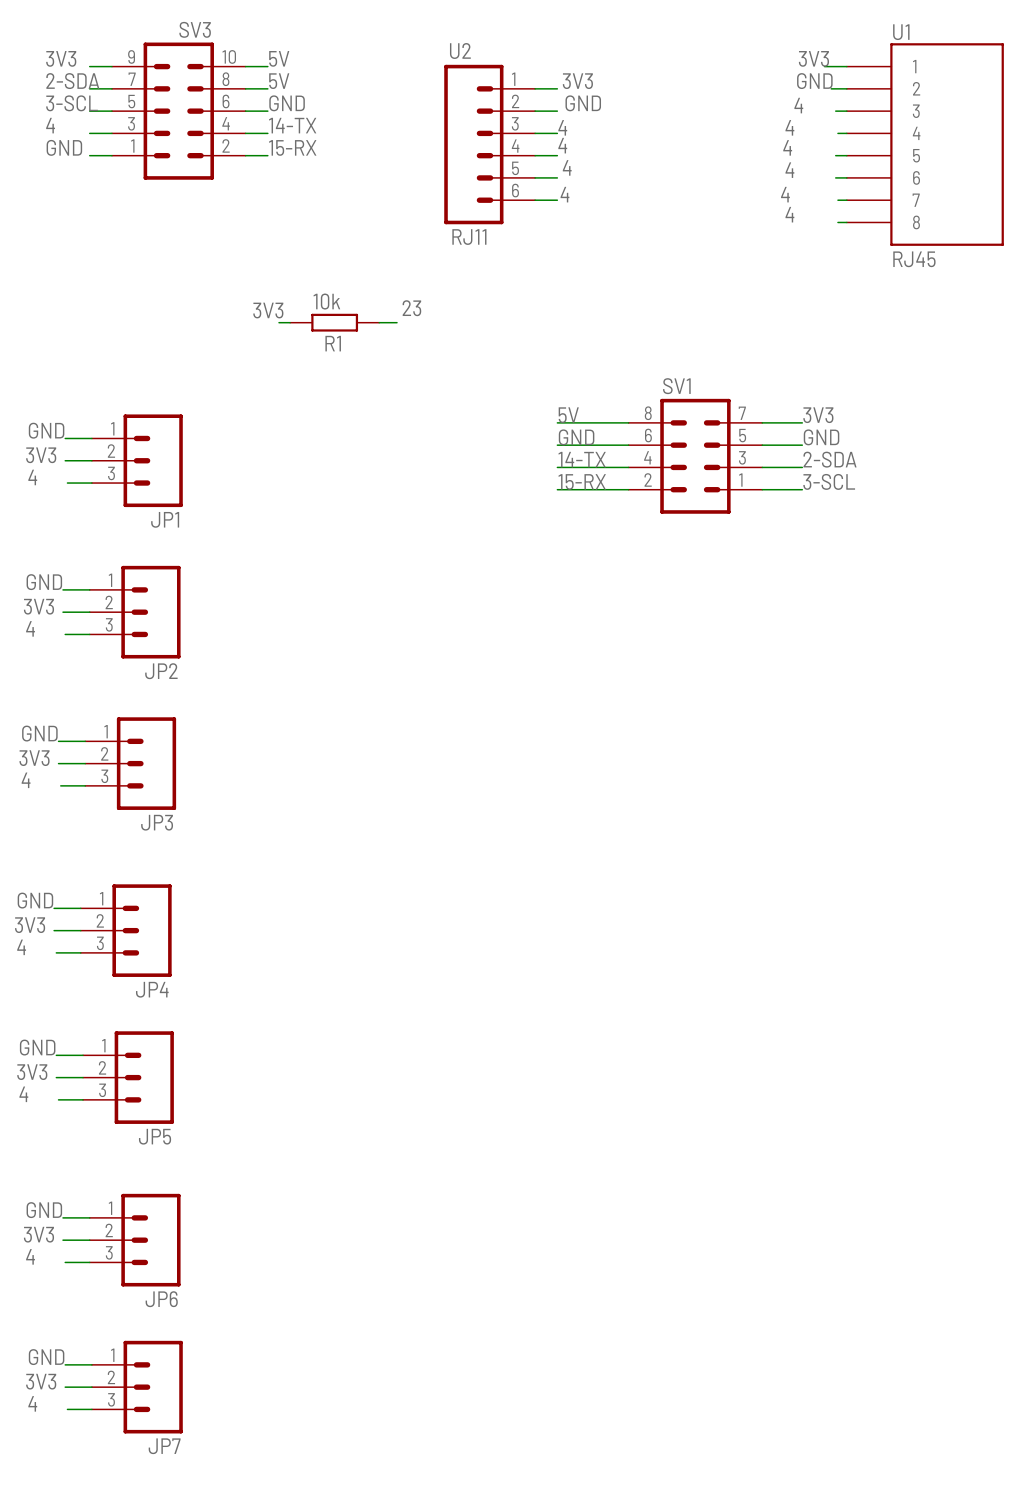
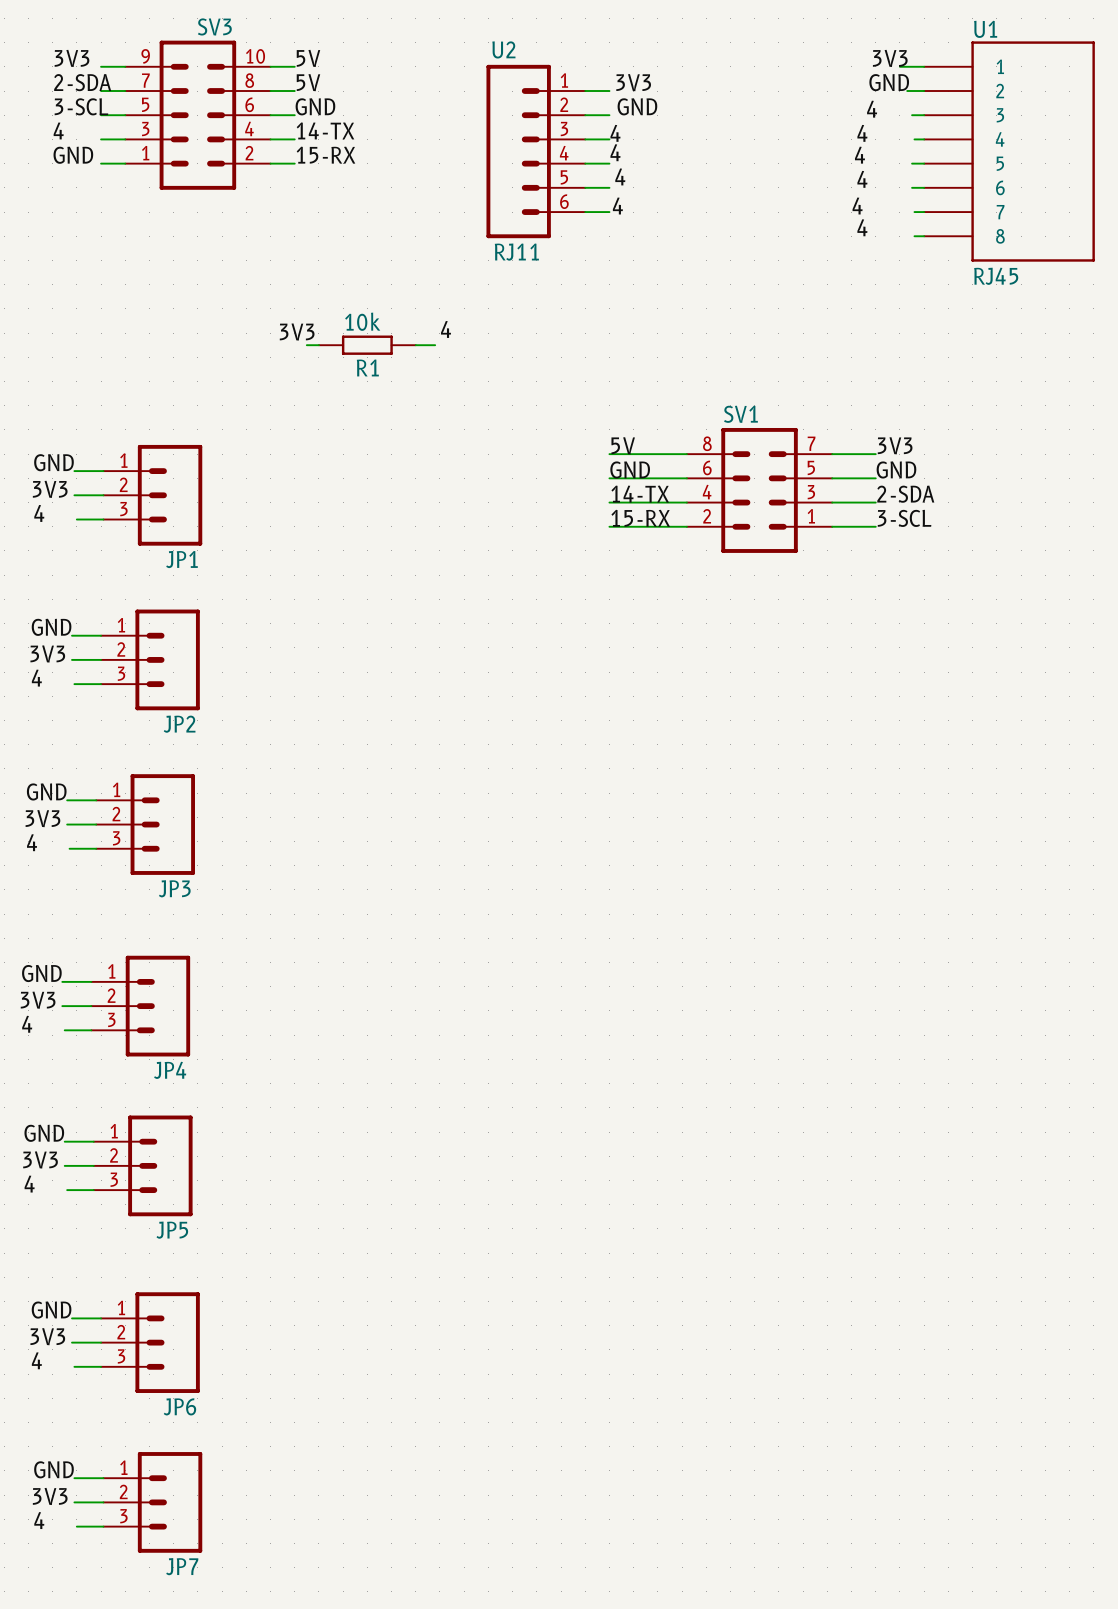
label: 23 (411, 308) -> 4 (446, 329)

